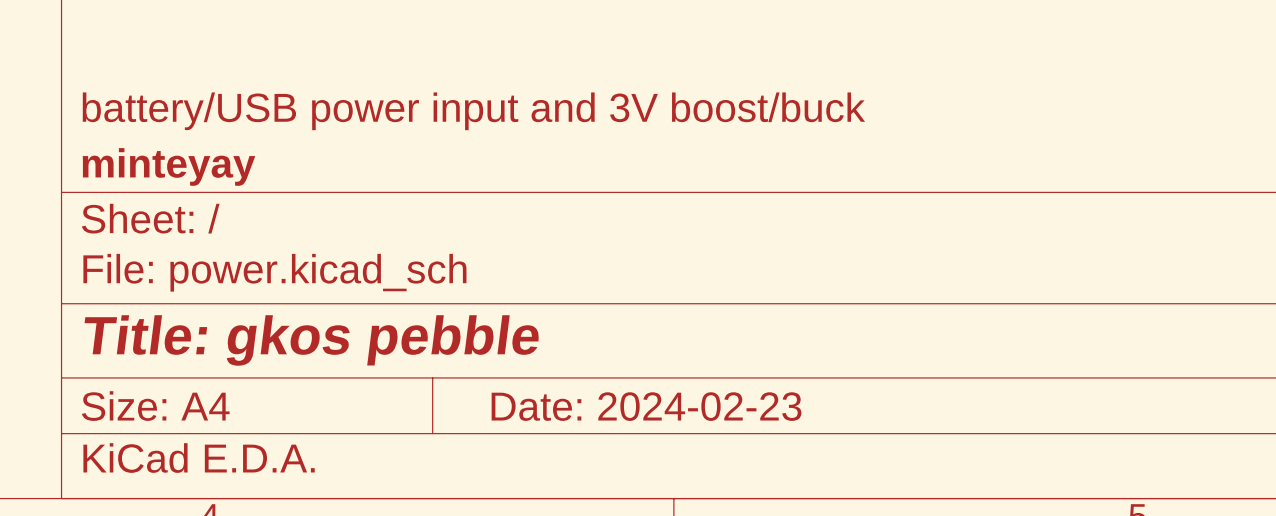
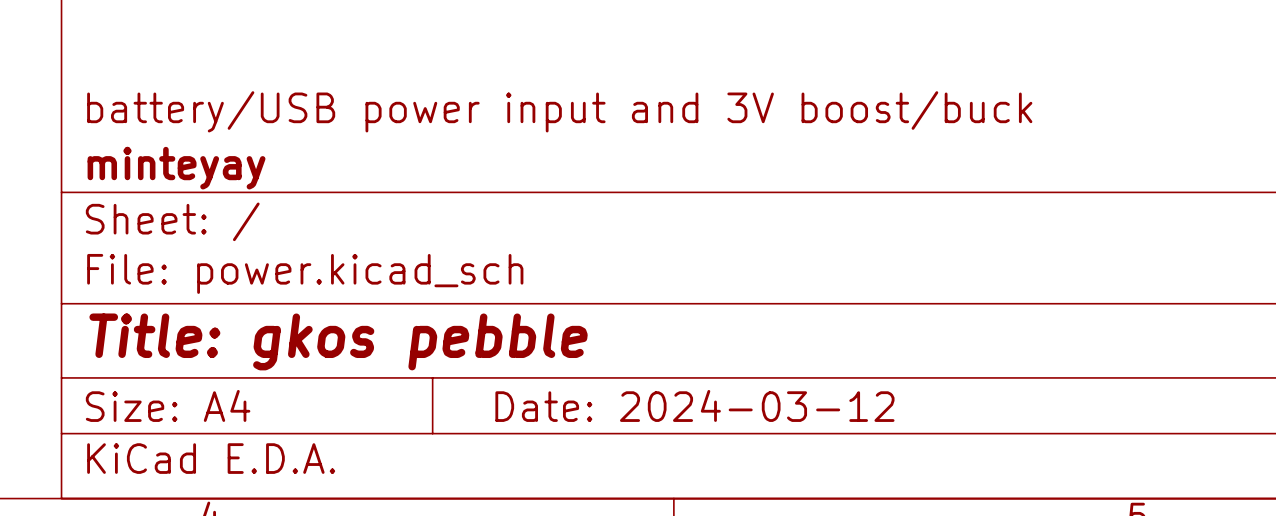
title block: Date: 2024-02-23 (646, 406) -> Date: 2024-03-12 (694, 405)

